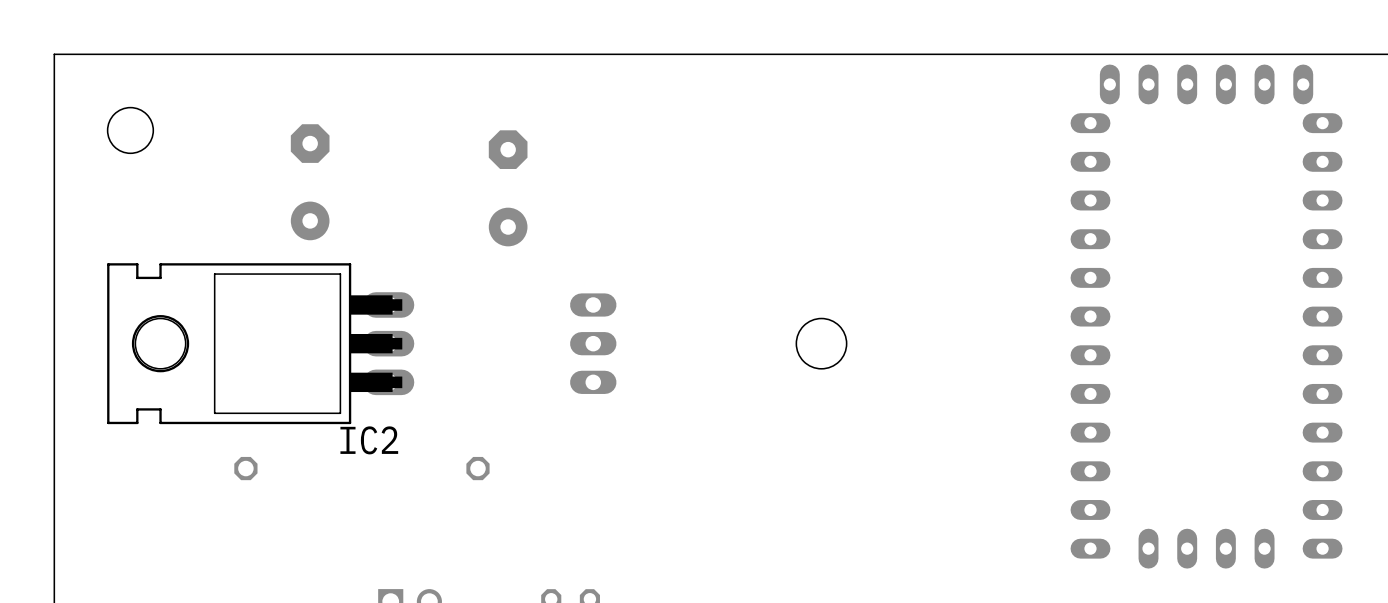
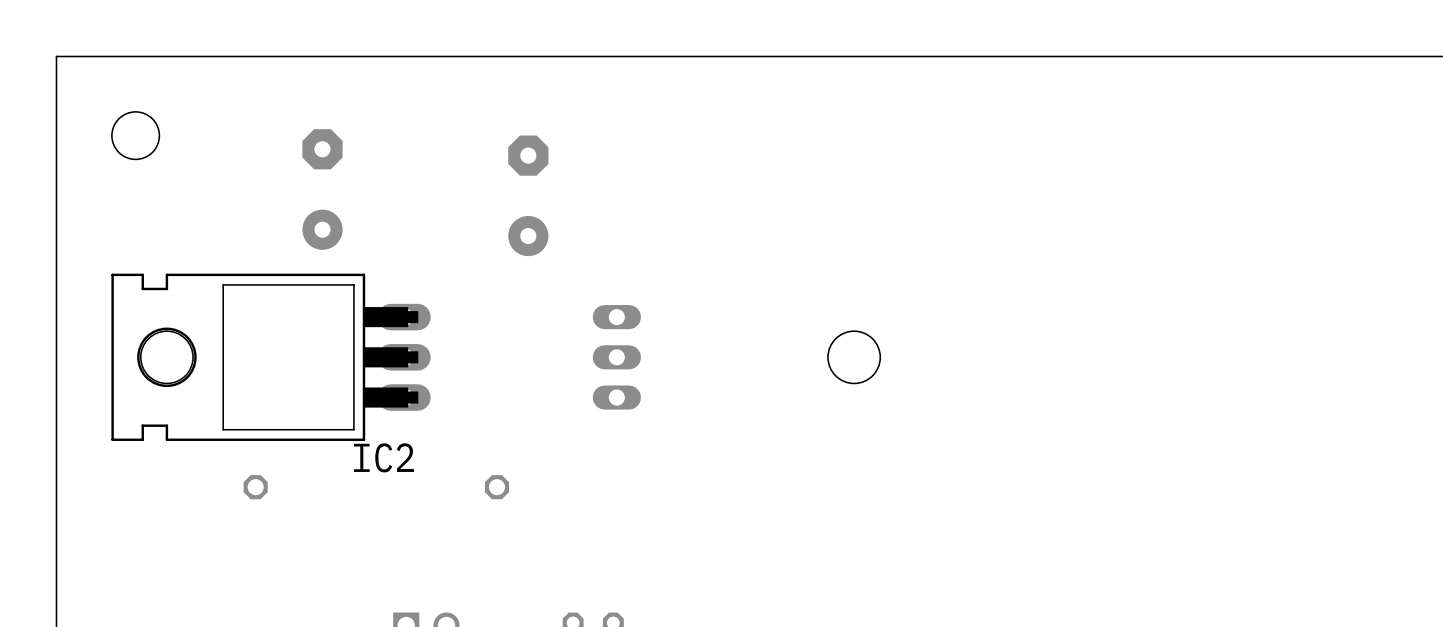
part: (1206, 316) -> none

